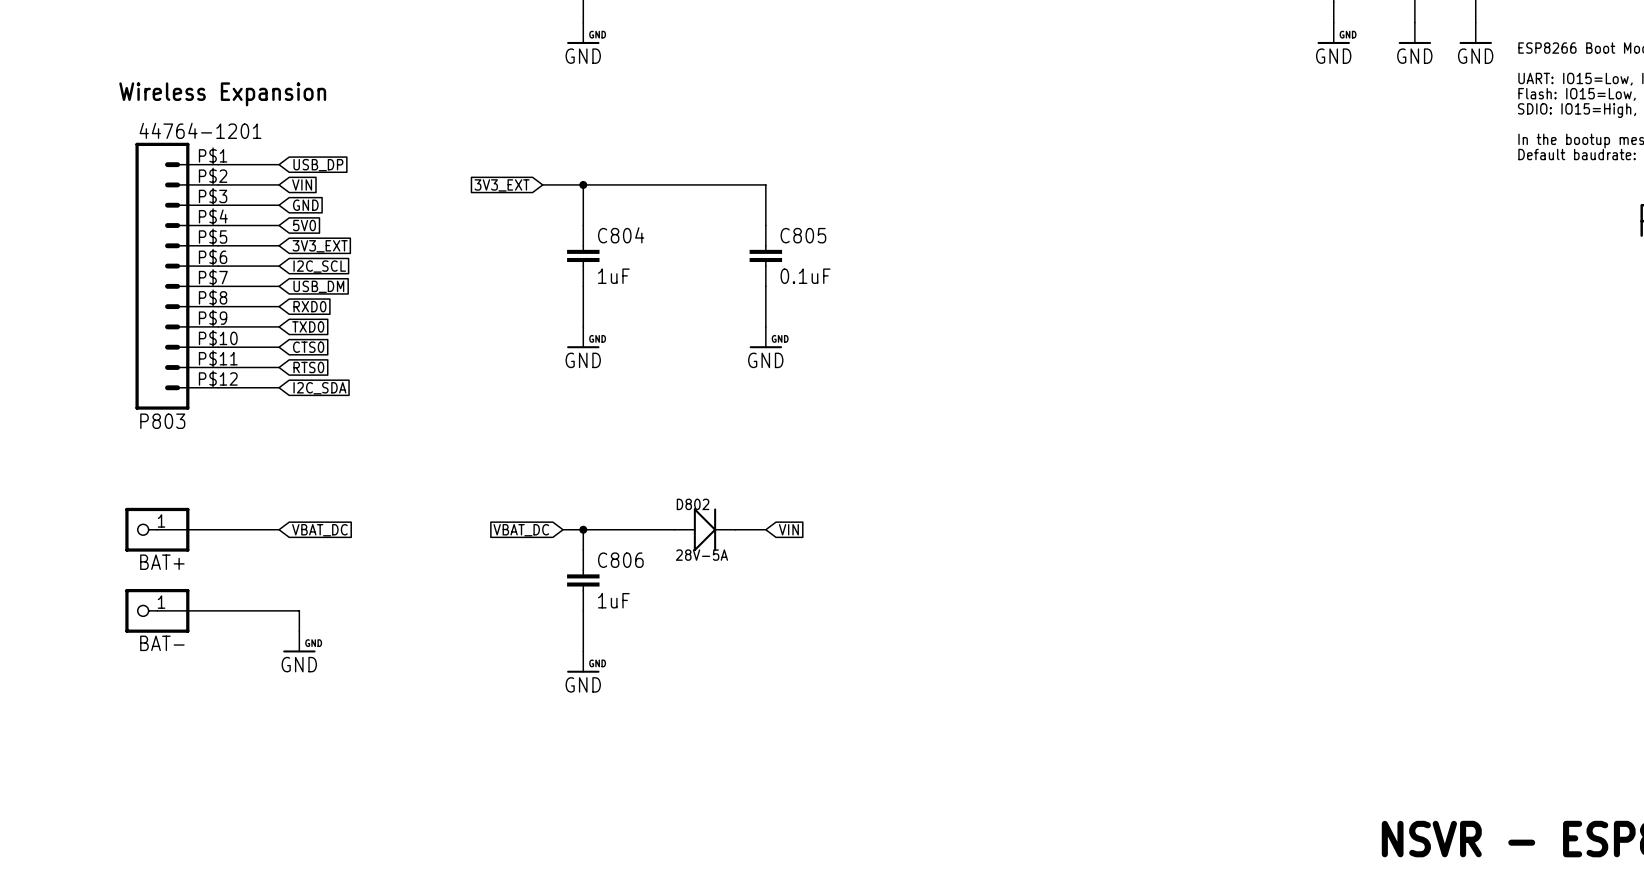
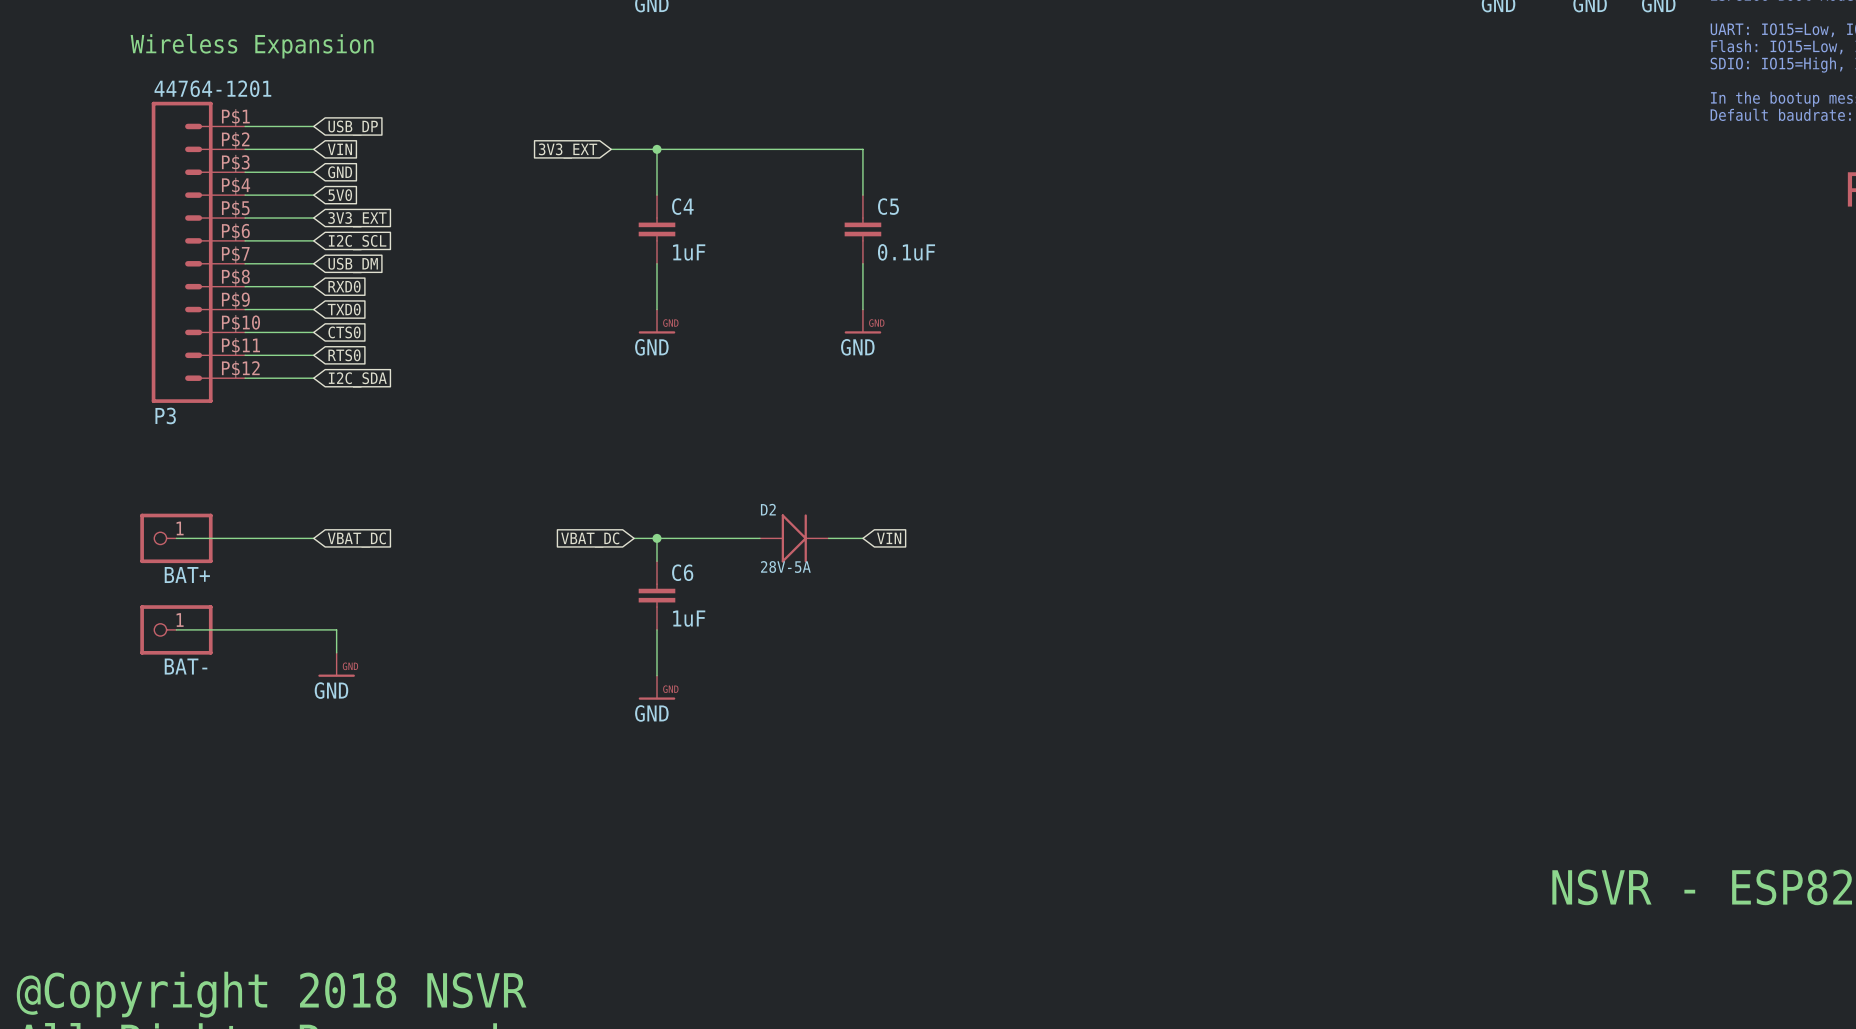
C804 name: C804 (621, 235) -> C4 (682, 206)
C805 name: C805 (803, 235) -> C5 (888, 206)
P803 name: P803 (162, 421) -> P3 (165, 415)
D802 name: D802 (693, 504) -> D2 (768, 509)
C806 name: C806 (620, 560) -> C6 (682, 572)

